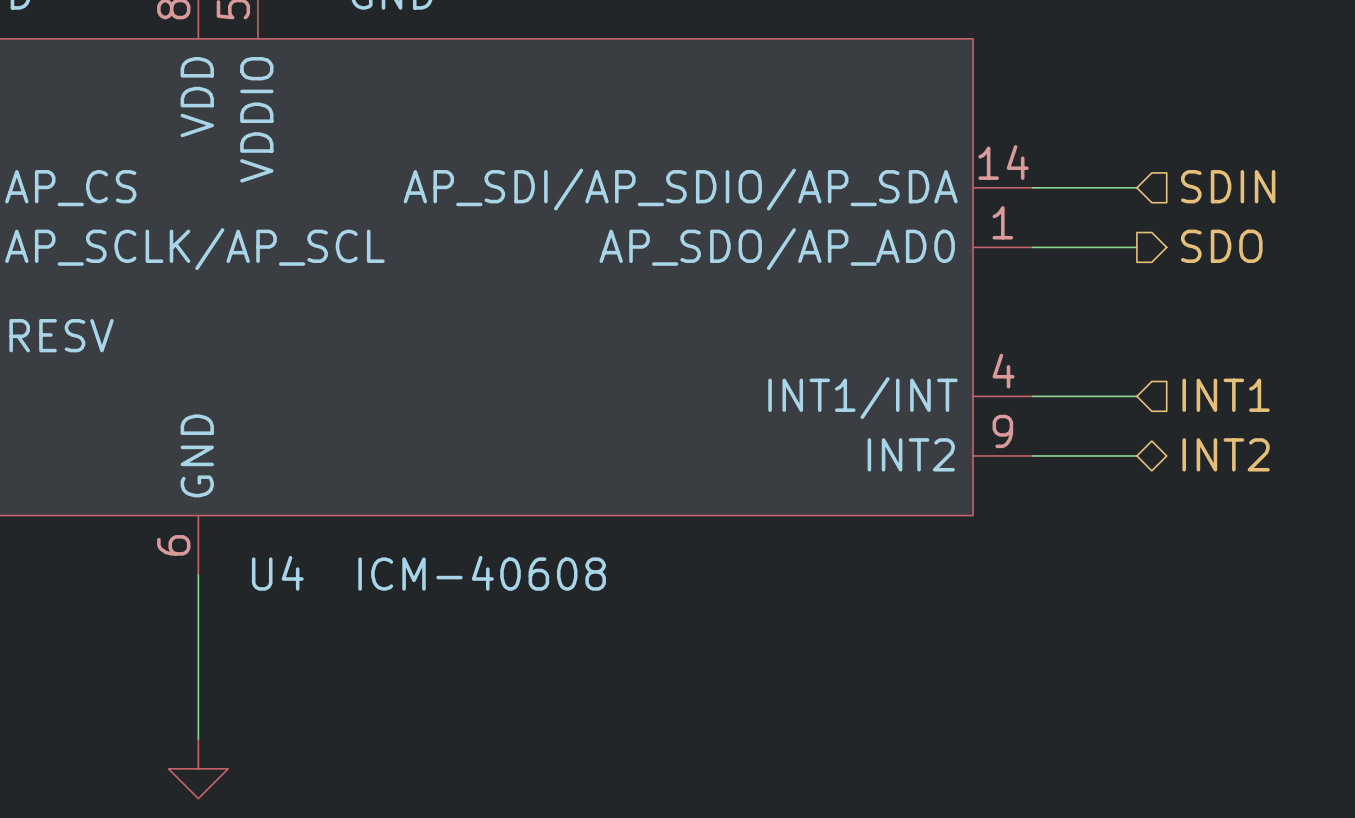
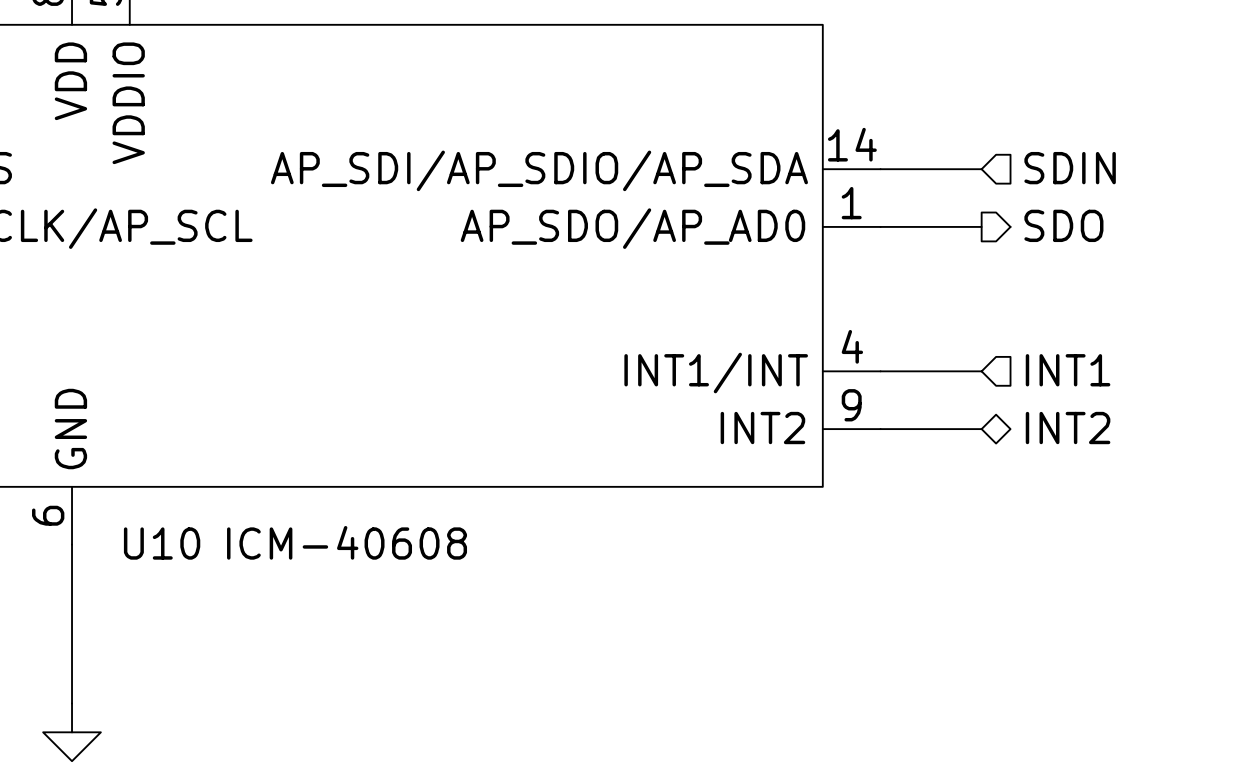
U4 name: U4 (277, 573) -> U10 (162, 543)

